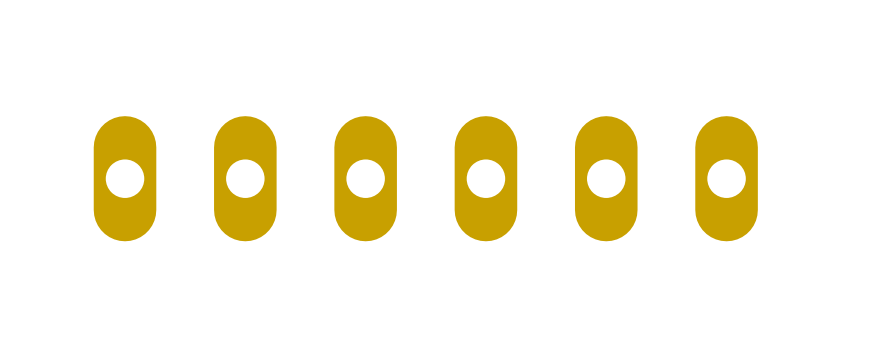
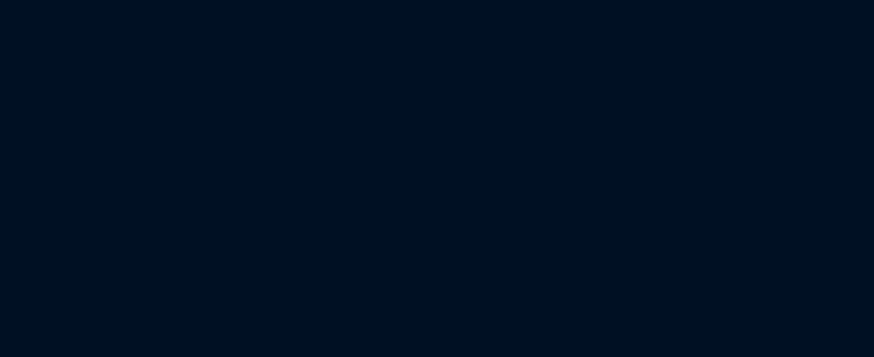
part: (425, 178) -> none

